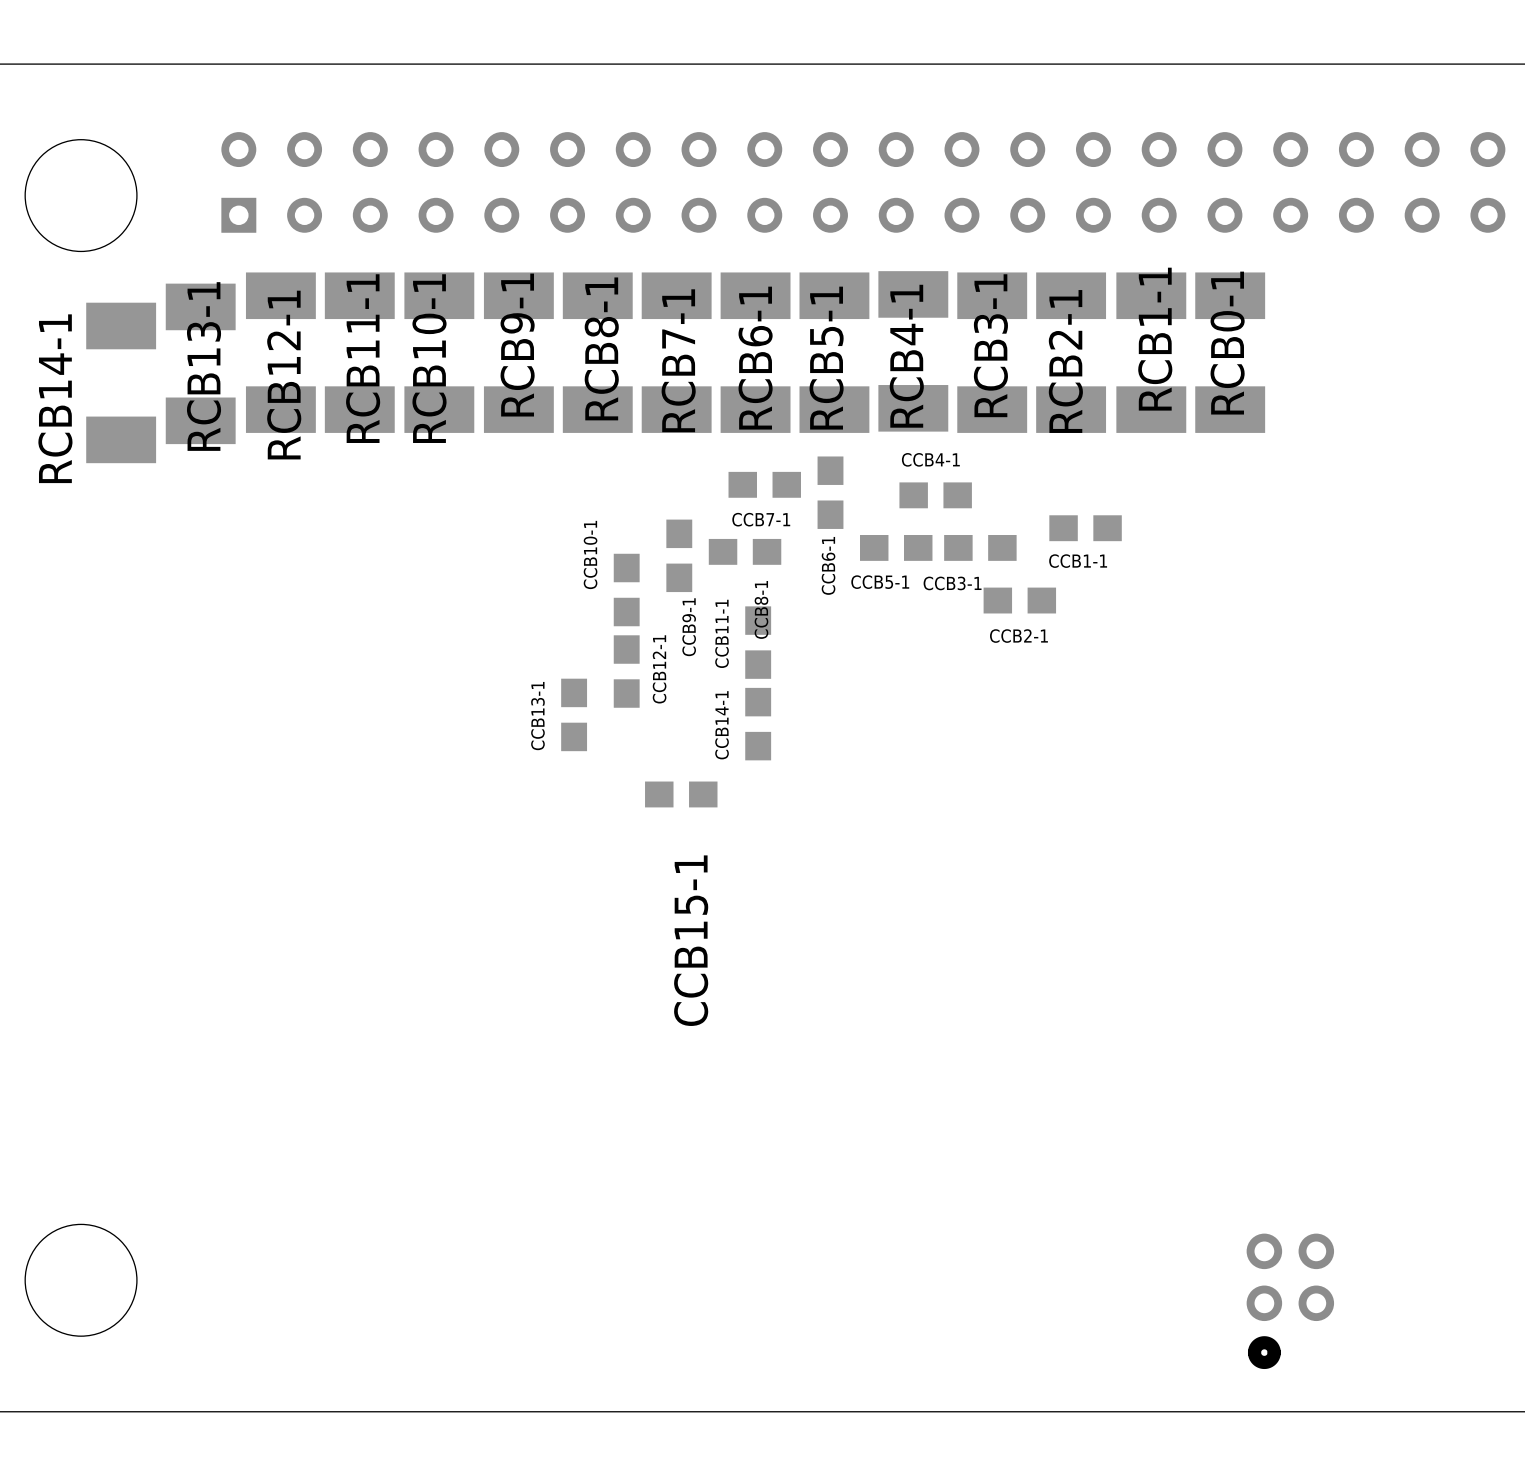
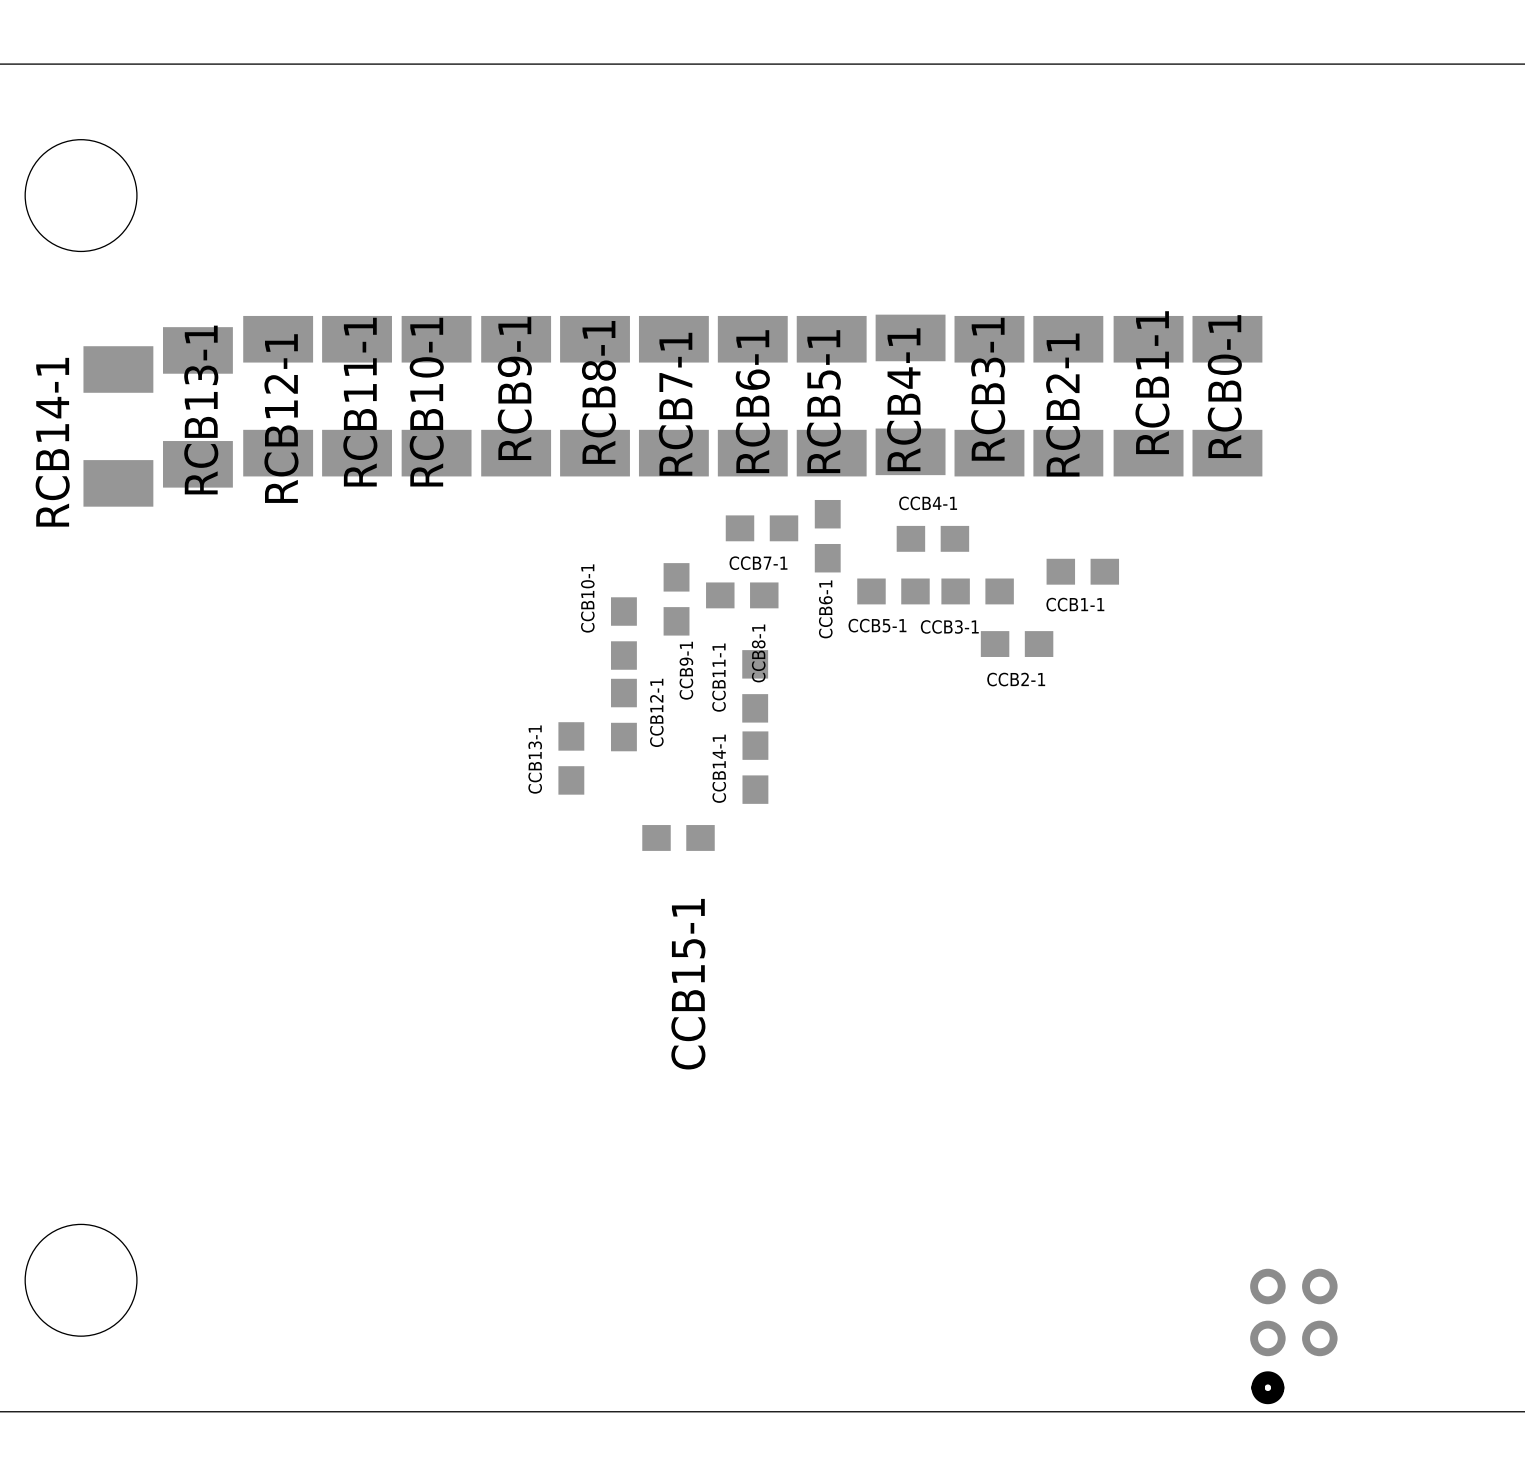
part: (863, 182) -> none
RCB4-1 position: (913, 351) -> (910, 394)
RCB12-1 position: (280, 352) -> (278, 396)
RCB11-1 position: (359, 352) -> (357, 396)
RCB10-1 position: (439, 352) -> (436, 396)
RCB9-1 position: (518, 352) -> (516, 396)
RCB8-1 position: (597, 352) -> (595, 396)
RCB7-1 position: (676, 352) -> (673, 396)
RCB6-1 position: (755, 352) -> (752, 396)
RCB5-1 position: (834, 352) -> (831, 396)
RCB3-1 position: (992, 352) -> (989, 396)
RCB2-1 position: (1071, 352) -> (1068, 396)
RCB1-1 position: (1151, 352) -> (1148, 396)
RCB0-1 position: (1230, 352) -> (1227, 396)
RCB13-1 position: (200, 363) -> (197, 407)
RCB14-1 position: (121, 382) -> (118, 426)
CCB7-1 position: (764, 484) -> (762, 528)
CCB6-1 position: (830, 492) -> (827, 536)
CCB4-1 position: (935, 495) -> (932, 538)
CCB1-1 position: (1085, 528) -> (1082, 571)
CCB5-1 position: (896, 547) -> (893, 591)
CCB3-1 position: (980, 547) -> (977, 591)
CCB8-1 position: (745, 551) -> (742, 595)
CCB9-1 position: (679, 555) -> (676, 599)
CCB10-1 position: (626, 590) -> (623, 633)
CCB2-1 position: (1019, 600) -> (1017, 644)
CCB11-1 position: (758, 642) -> (755, 686)
CCB12-1 position: (626, 671) -> (623, 715)
CCB13-1 position: (574, 714) -> (571, 758)
CCB14-1 position: (758, 724) -> (755, 767)
CCB15-1 position: (681, 794) -> (678, 837)
part position: (1290, 1301) -> (1293, 1336)

